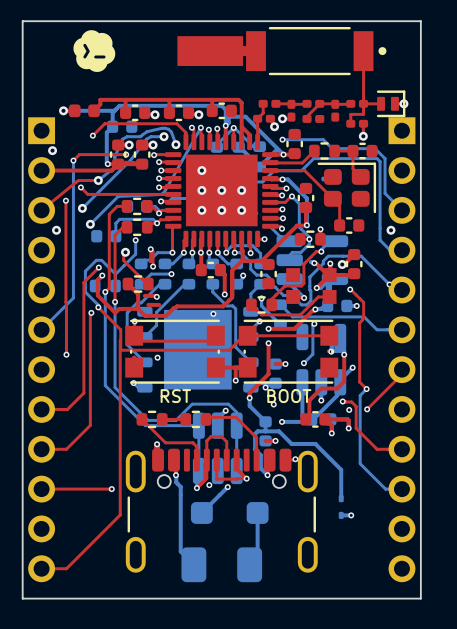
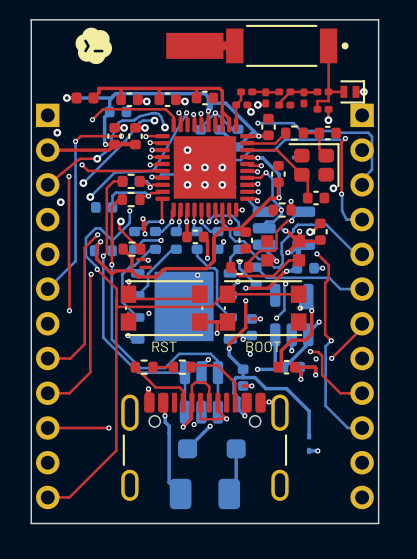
bottom track: (377, 150) (385, 158) (385, 193) (401, 210) -> (340, 132) (368, 132) (372, 136) (372, 169) (356, 184)
top track: none -> (345, 138) (341, 142) (341, 194)
via: none -> (345, 138)
bottom track: (377, 158) (380, 161) (380, 240) (390, 250) -> (341, 194) (342, 210) (346, 219) (351, 219)
via: none -> (341, 194)
via position: (391, 230) -> (333, 188)
via: (389, 284) -> none

